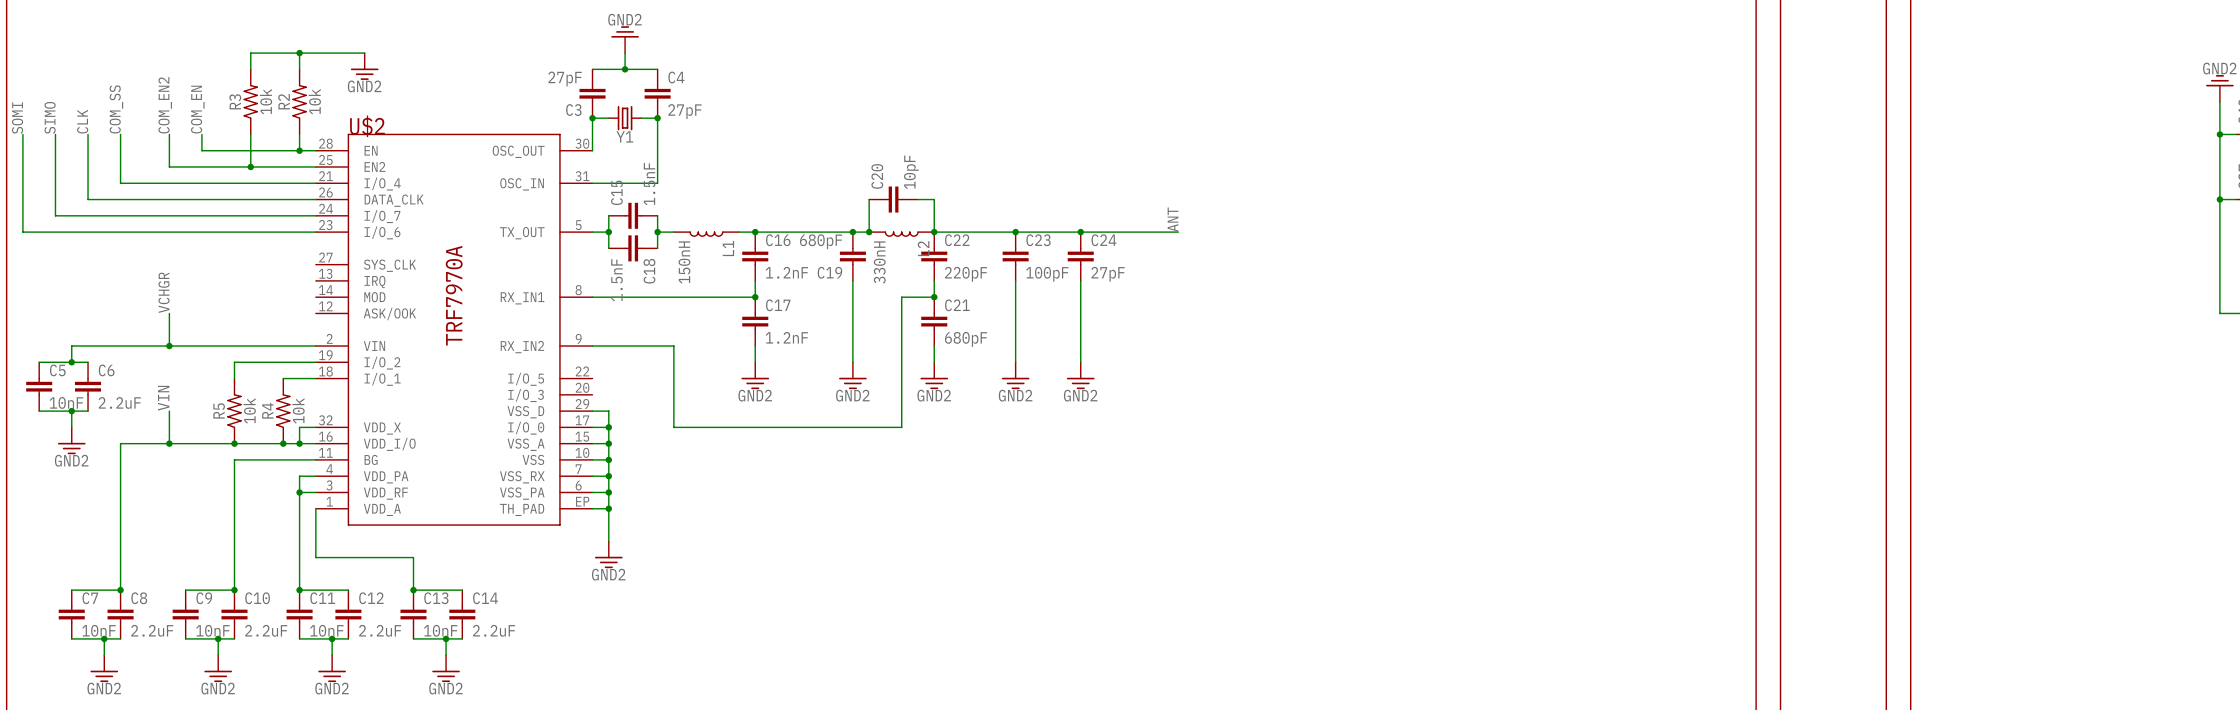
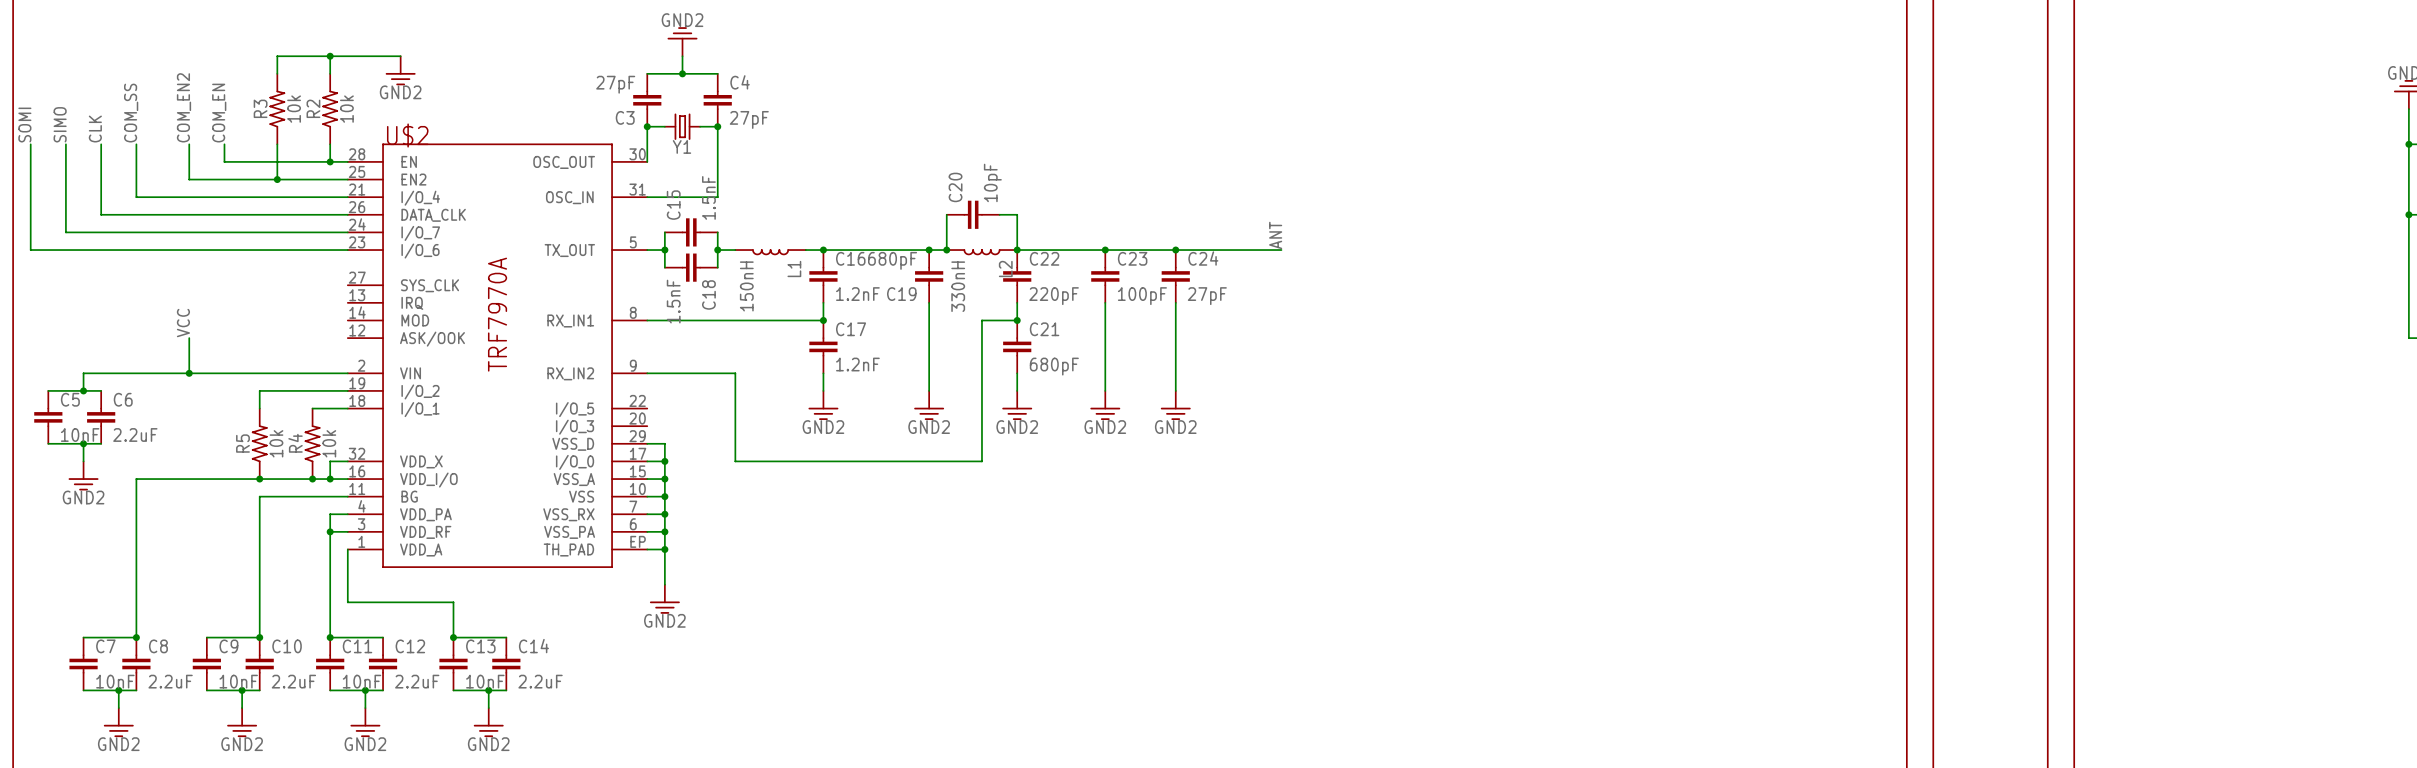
label: VCHGR (164, 292) -> VCC (183, 323)
label: VIN (163, 398) -> none
wire: (169, 411) (169, 443) -> none
junction: (169, 443) -> none

